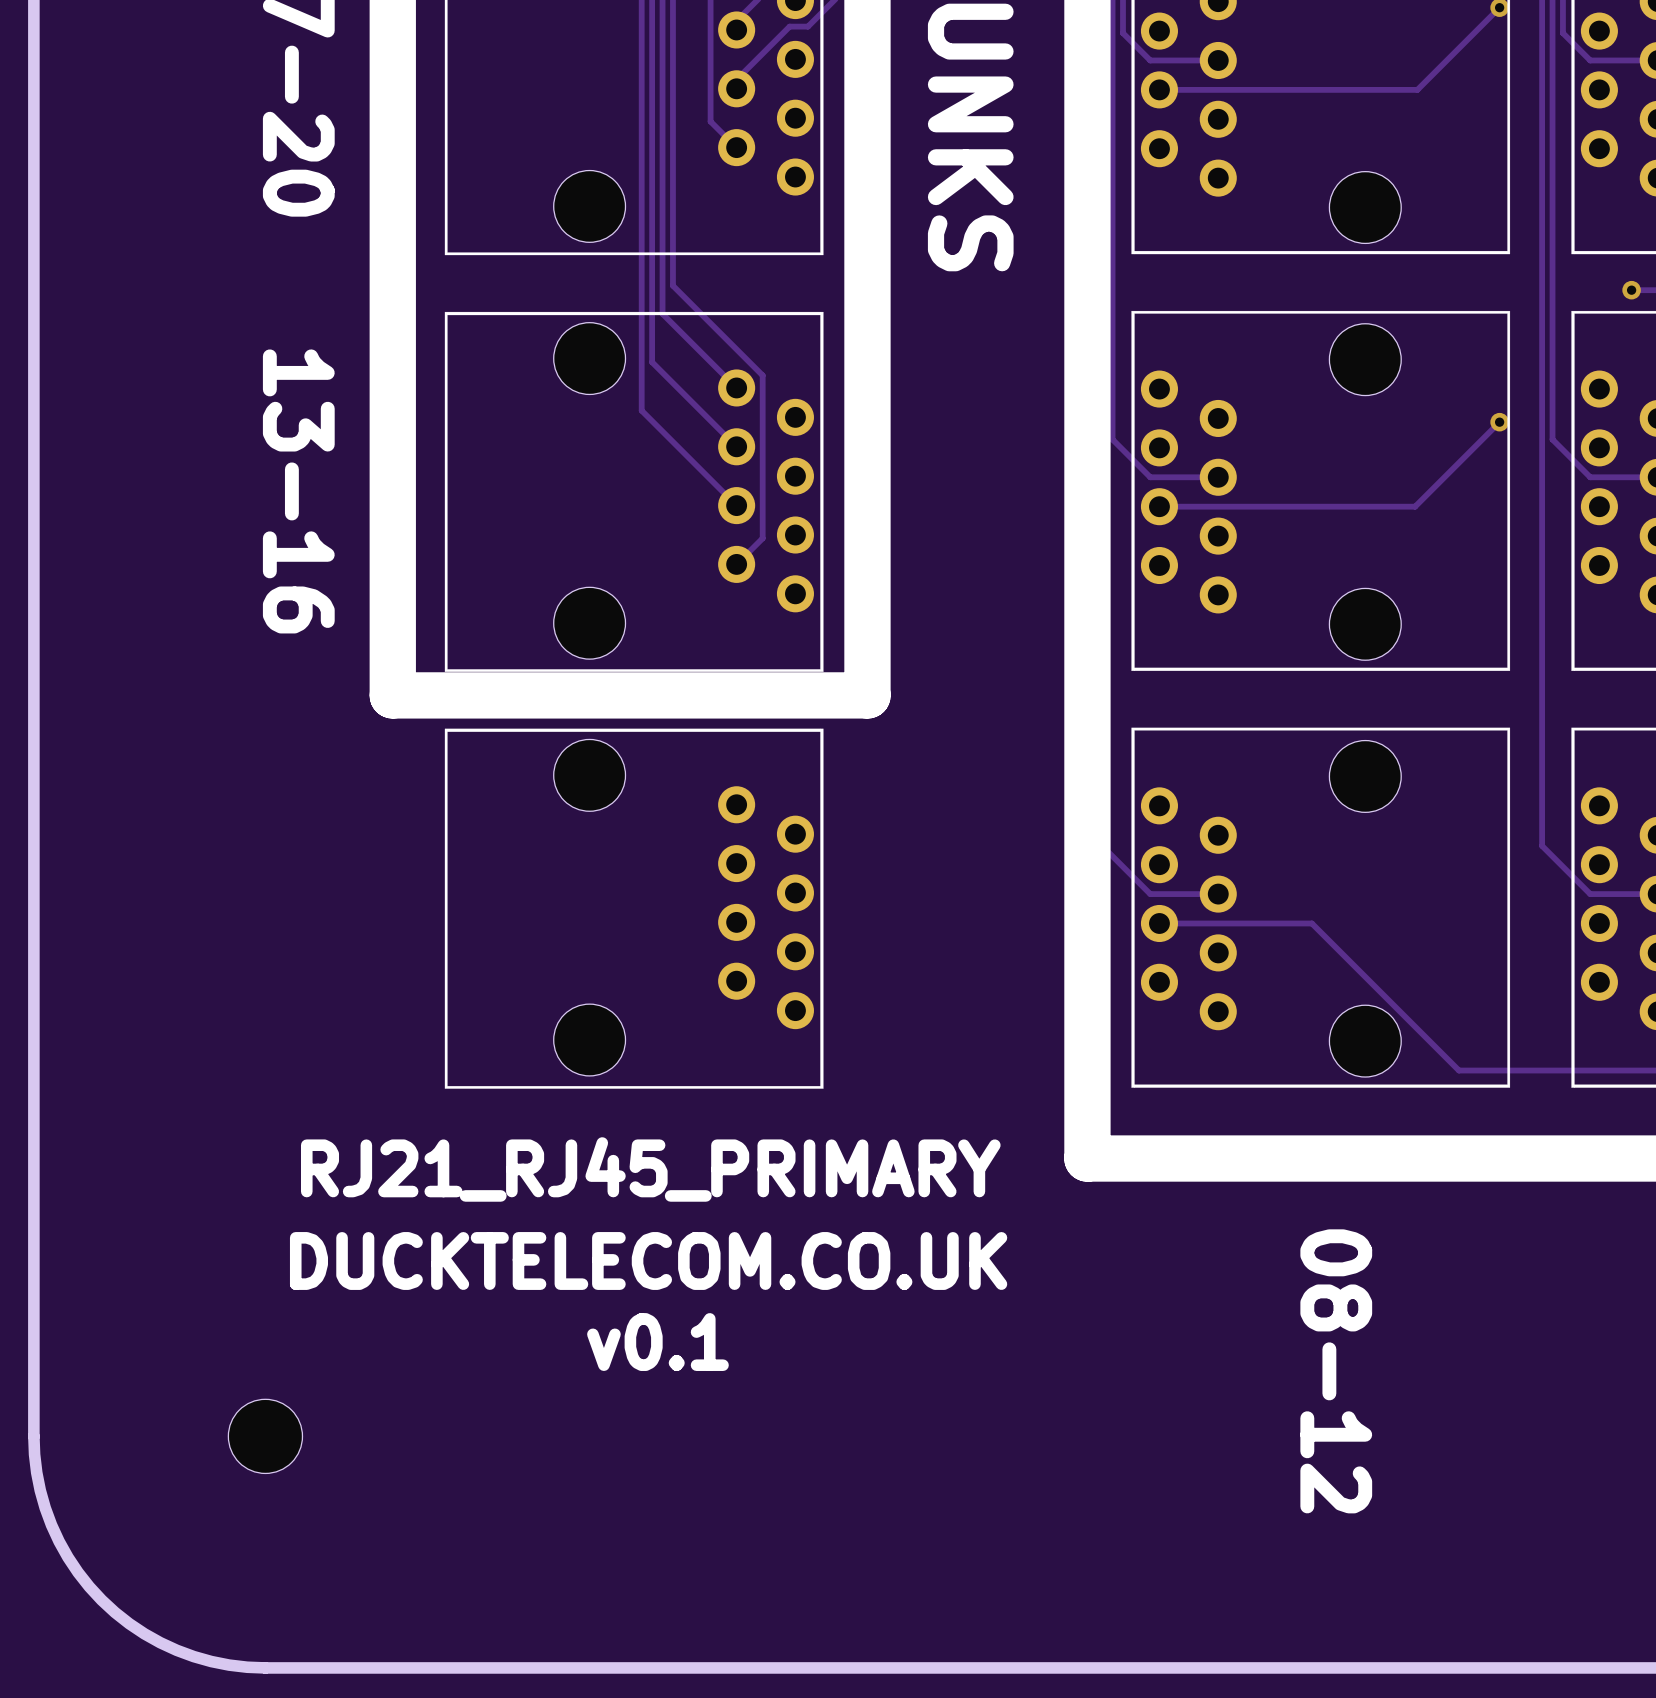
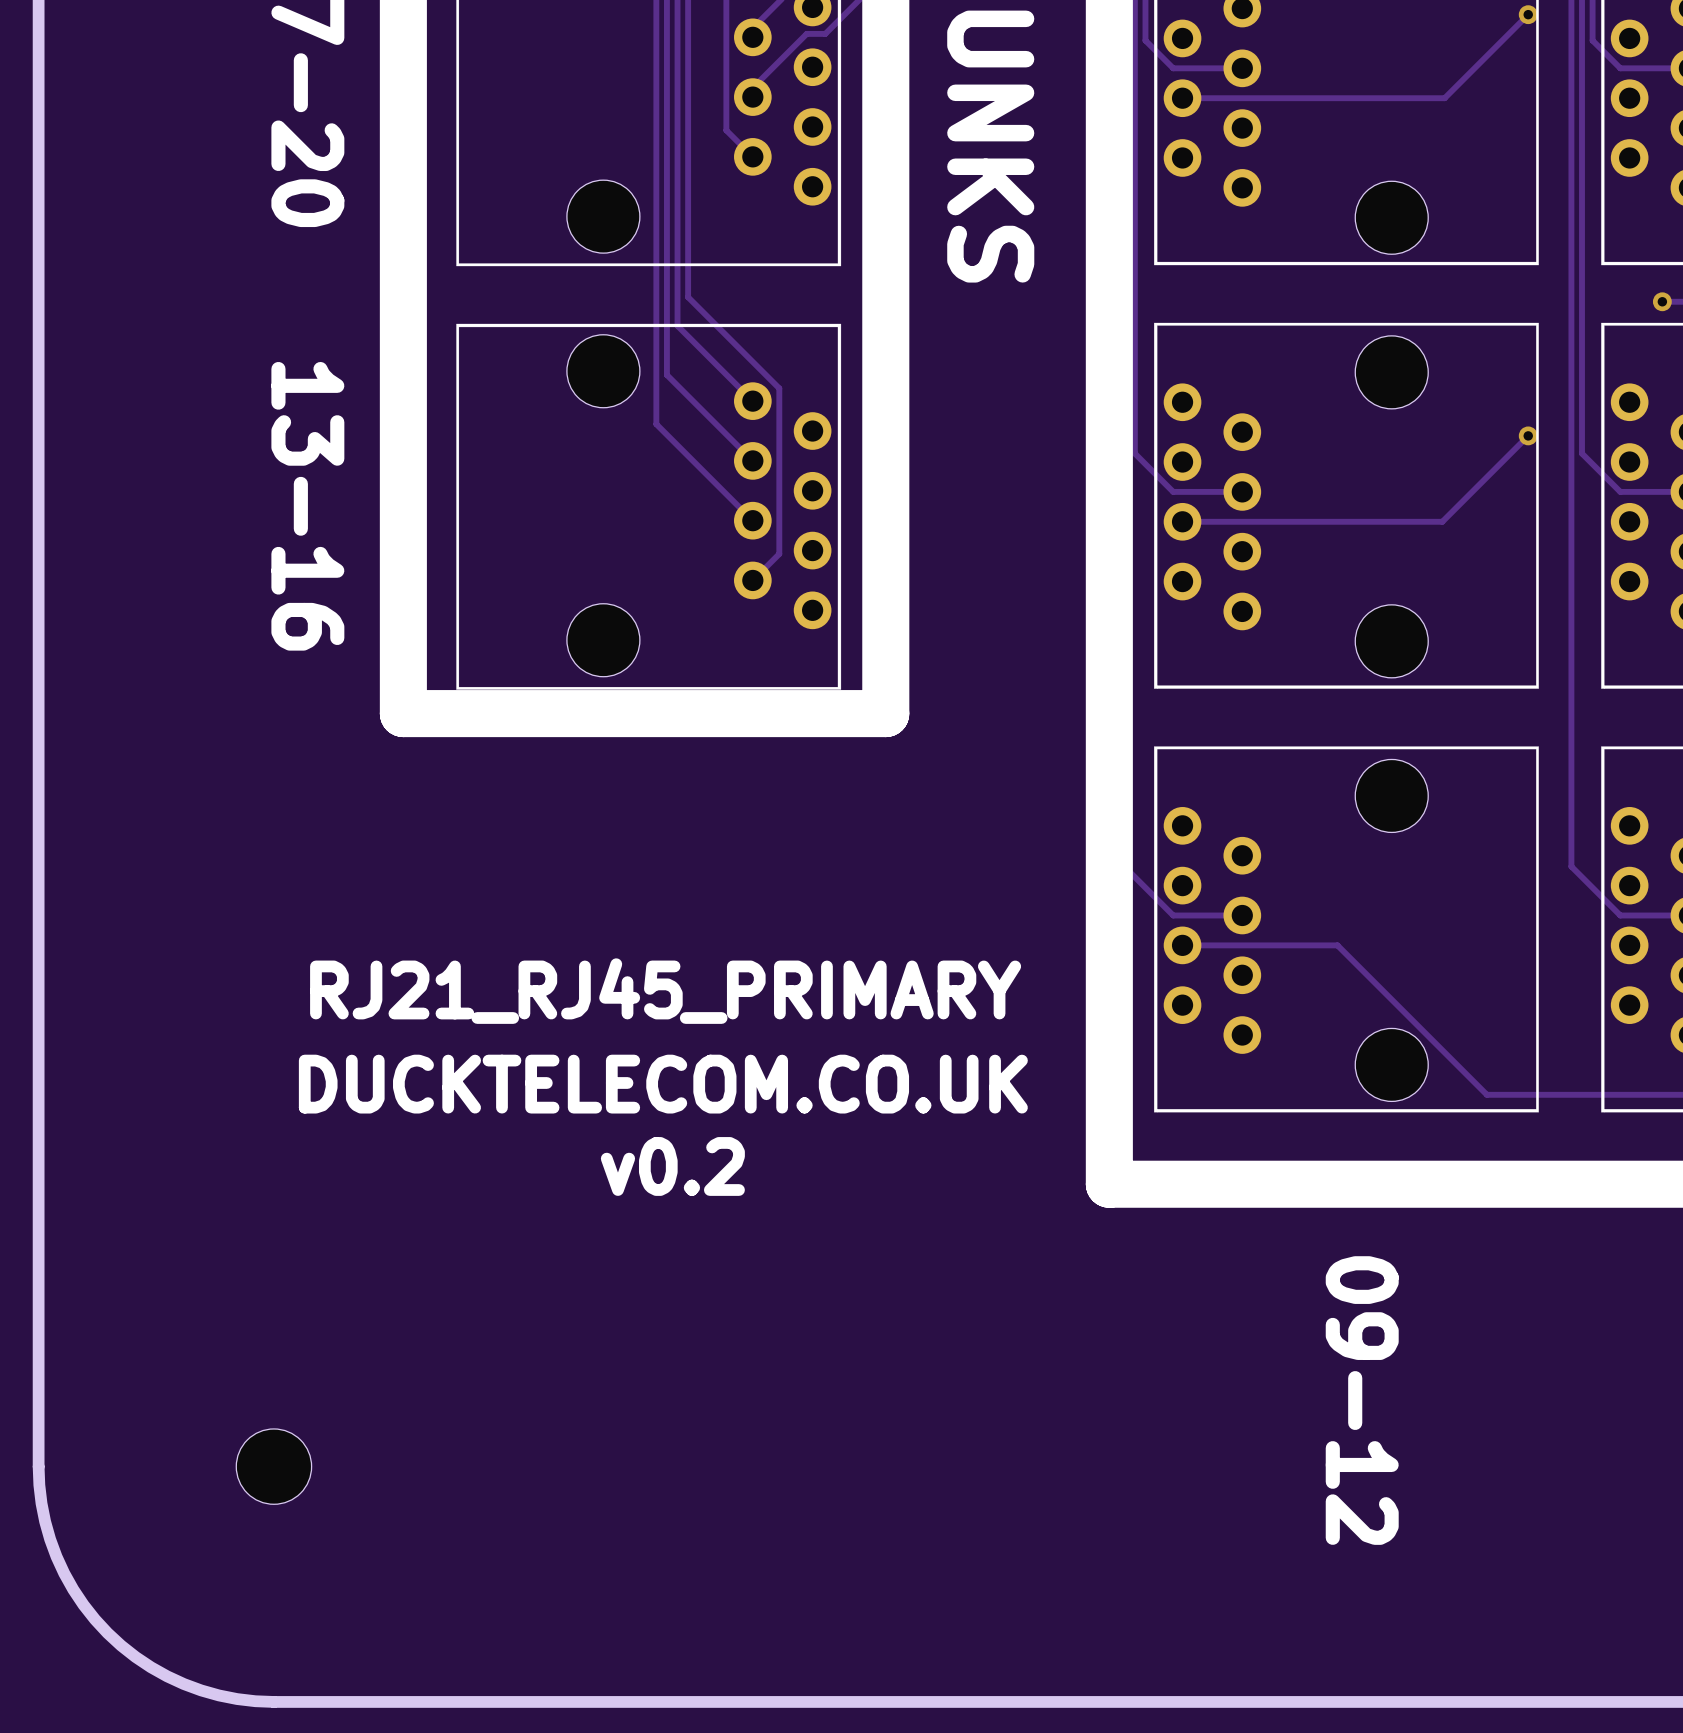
part: (634, 908) -> none
text: none -> v0.2 (672, 1166)
text position: RJ21_RJ45_PRIMARY (650, 1169) -> RJ21_RJ45_PRIMARY (665, 991)
text position: DUCKTELECOM.CO.UK (648, 1260) -> DUCKTELECOM.CO.UK (663, 1084)
text: v0.1 (657, 1342) -> none
text: 08-12 (1336, 1371) -> 09-12 (1362, 1400)

